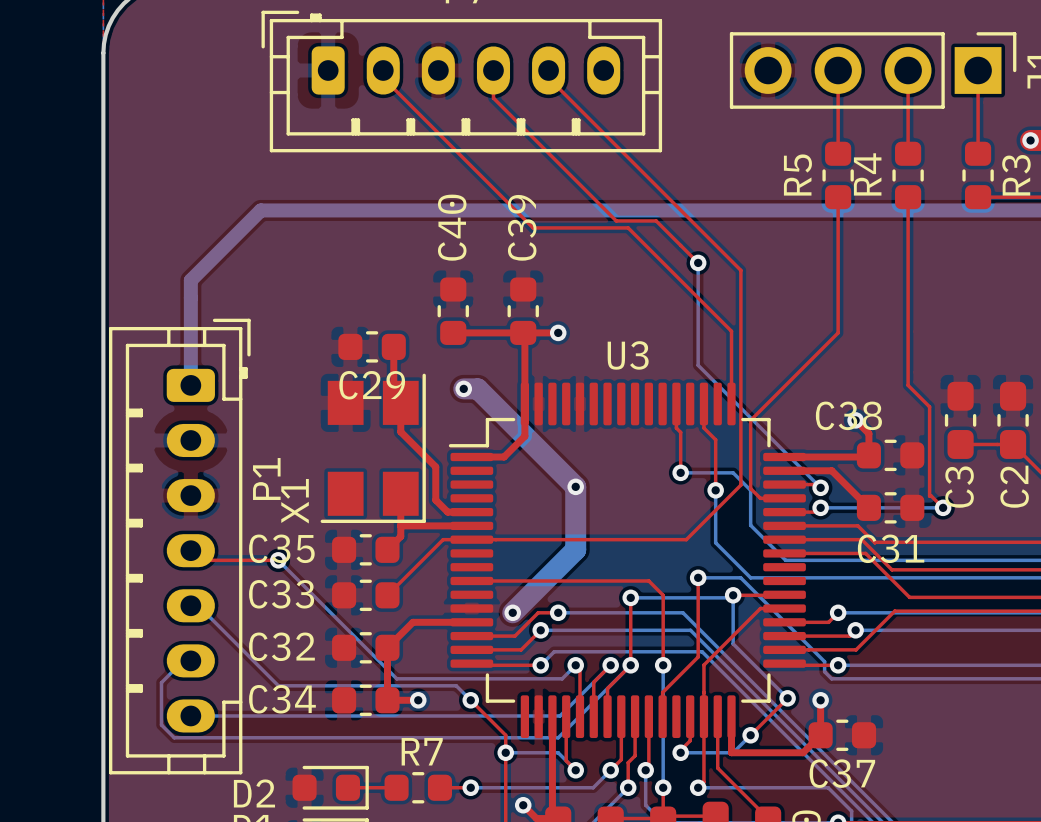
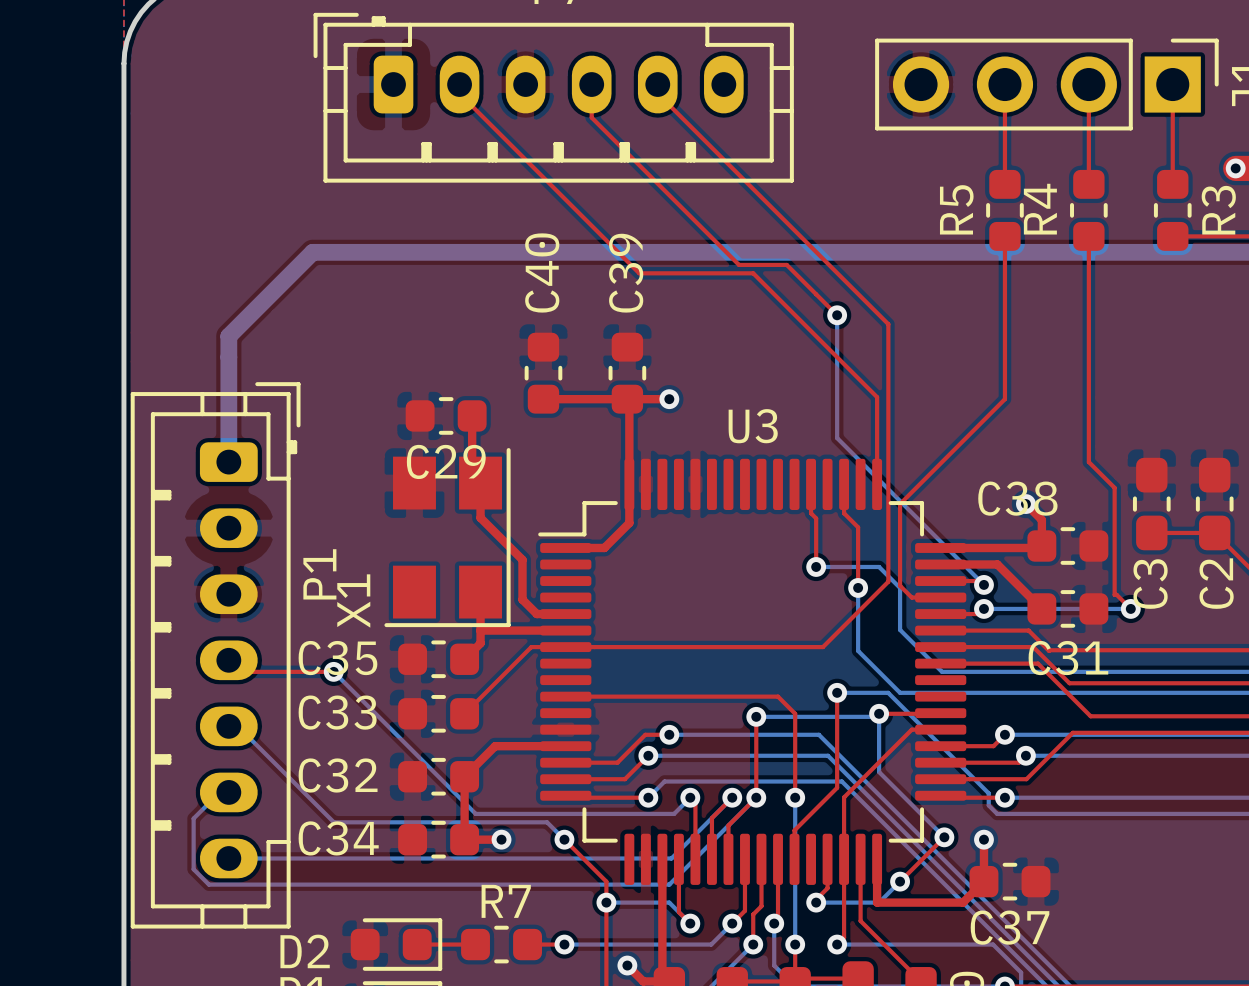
bottom track: (463, 388) (477, 388) (575, 486) (575, 549) (512, 612) -> none
via: (463, 388) -> none
via: (575, 486) -> none
via: (512, 612) -> none

